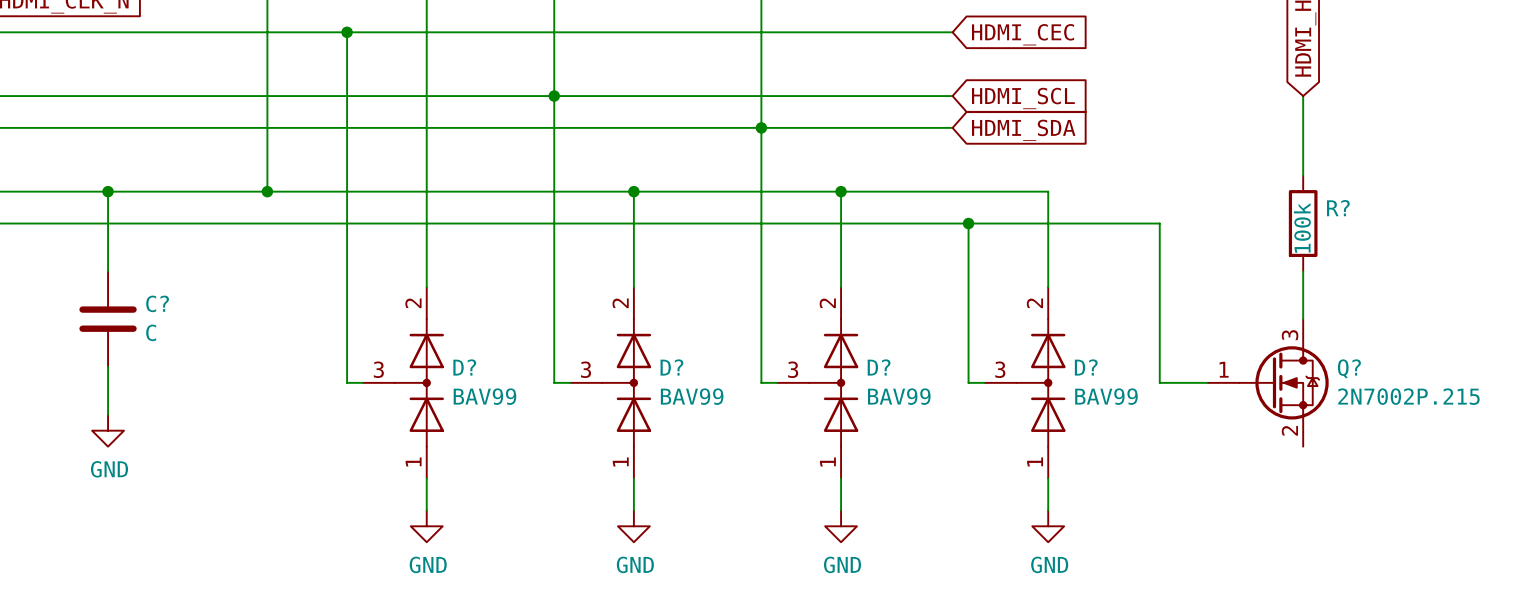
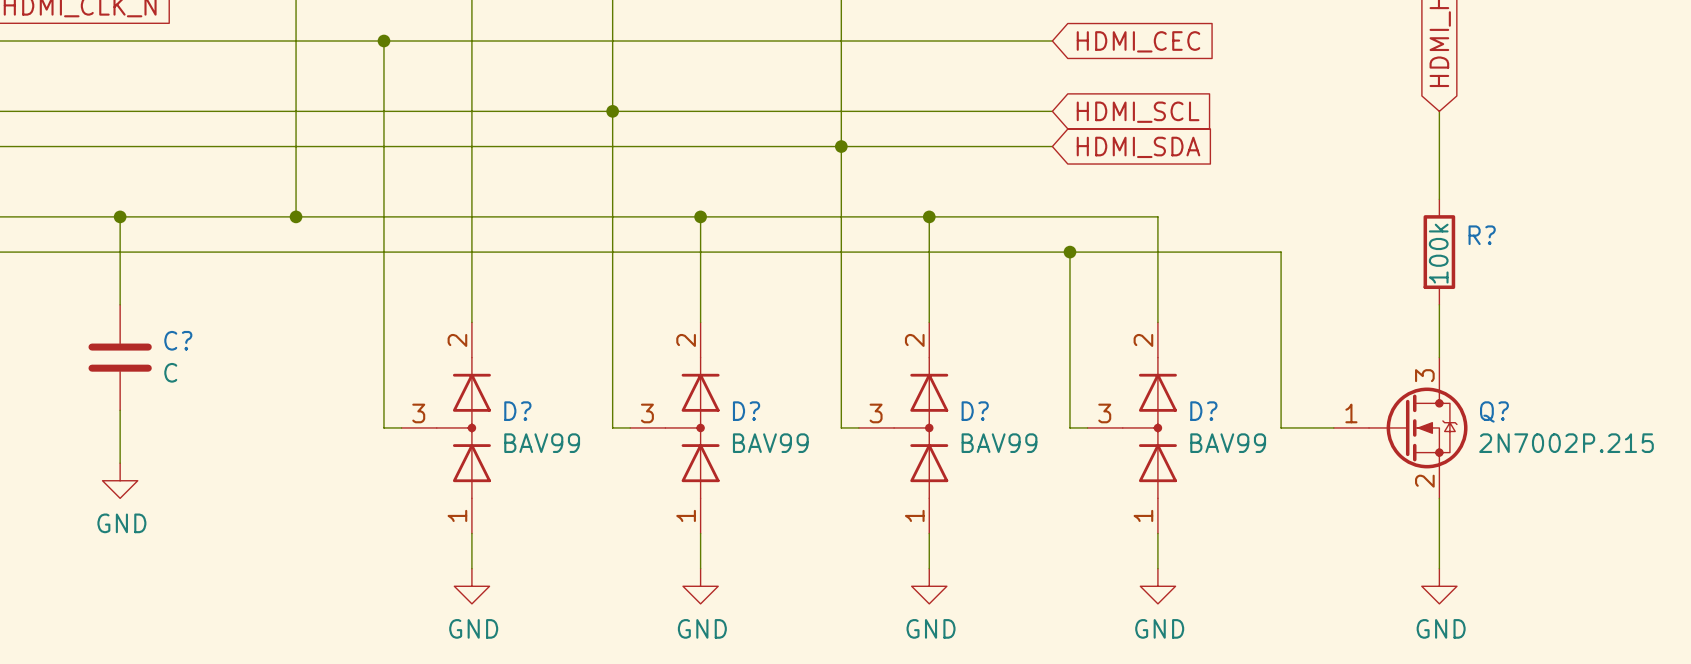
wire: none -> (1439, 498) (1439, 568)
power symbol: none -> GND (1439, 586)

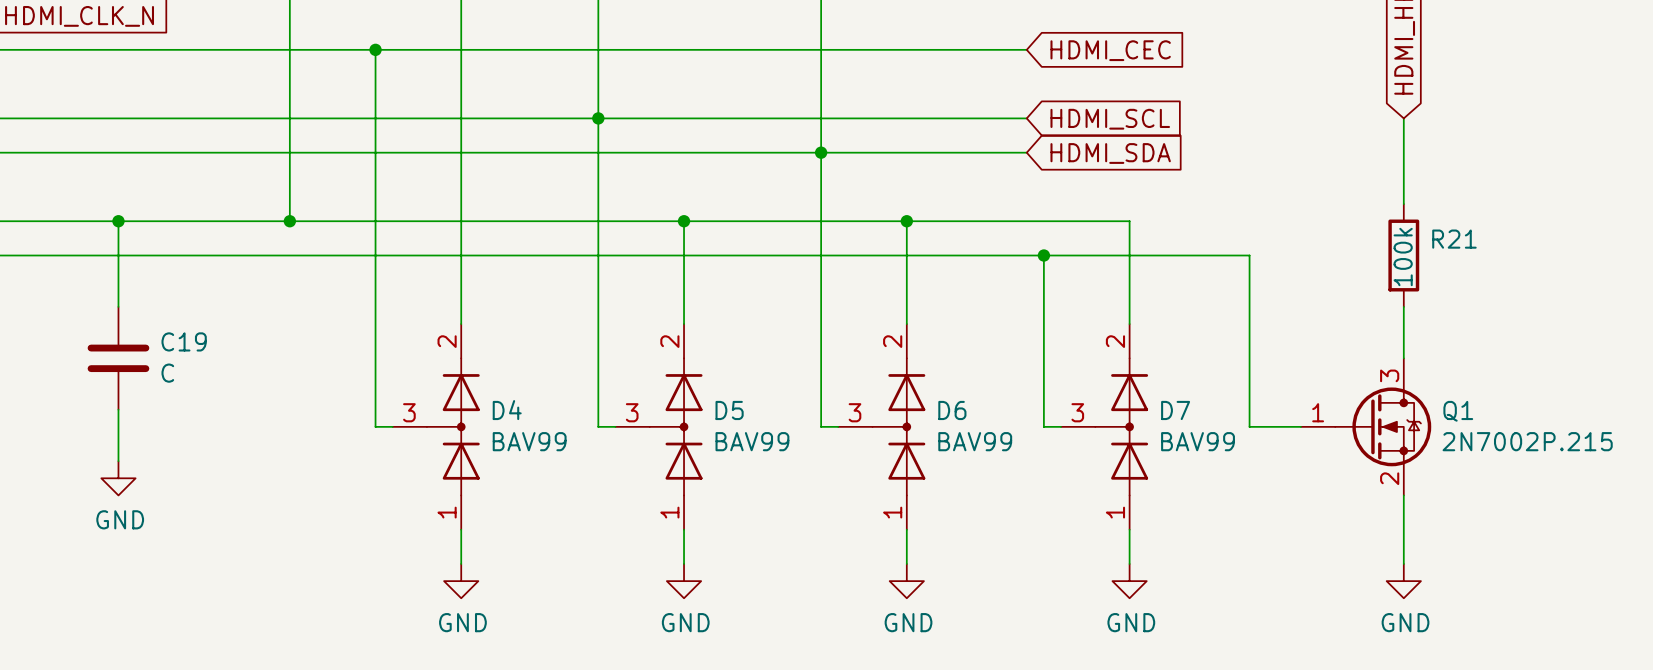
R? name: R? (1482, 235) -> R21 (1454, 239)
C? name: C? (178, 340) -> C19 (184, 341)
D? name: D? (517, 411) -> D4 (507, 410)
D? name: D? (746, 411) -> D5 (729, 410)
D? name: D? (975, 411) -> D6 (952, 410)
D? name: D? (1203, 411) -> D7 (1175, 410)
Q? name: Q? (1494, 411) -> Q1 (1458, 411)

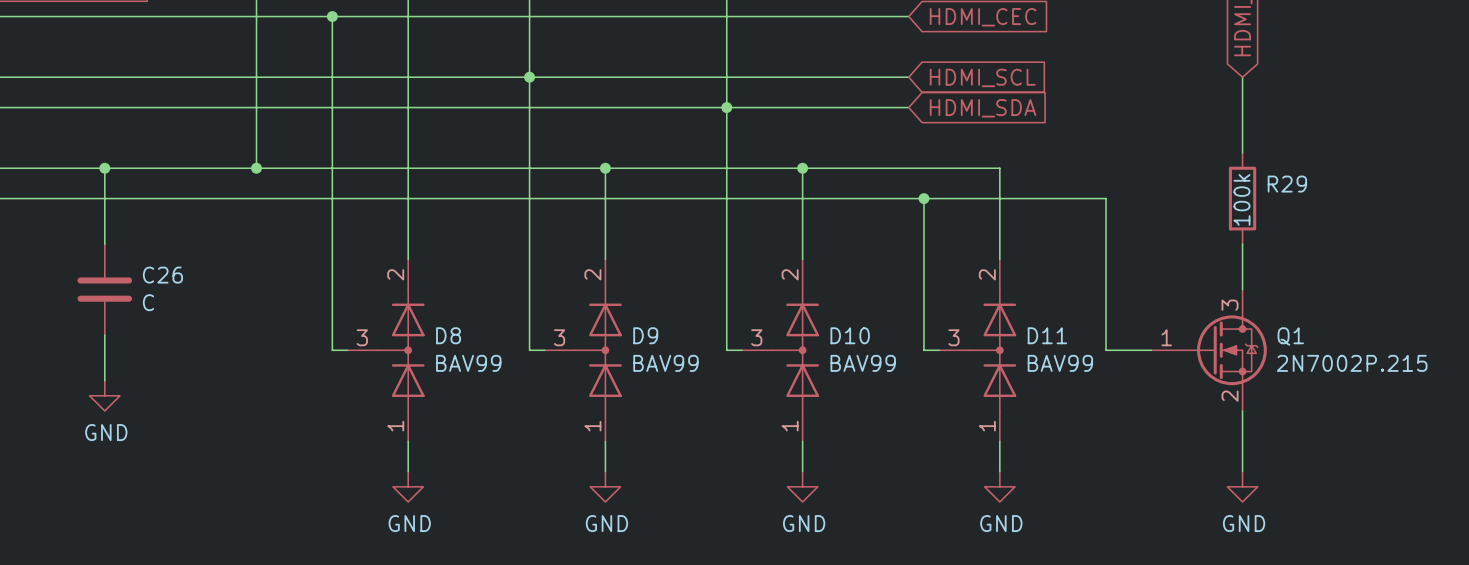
R21 name: R21 (1454, 239) -> R29 (1287, 184)
C19 name: C19 (184, 341) -> C26 (162, 275)
D4 name: D4 (507, 410) -> D8 (448, 335)
D5 name: D5 (729, 410) -> D9 (645, 335)
D6 name: D6 (952, 410) -> D10 (850, 335)
D7 name: D7 (1175, 410) -> D11 (1047, 335)

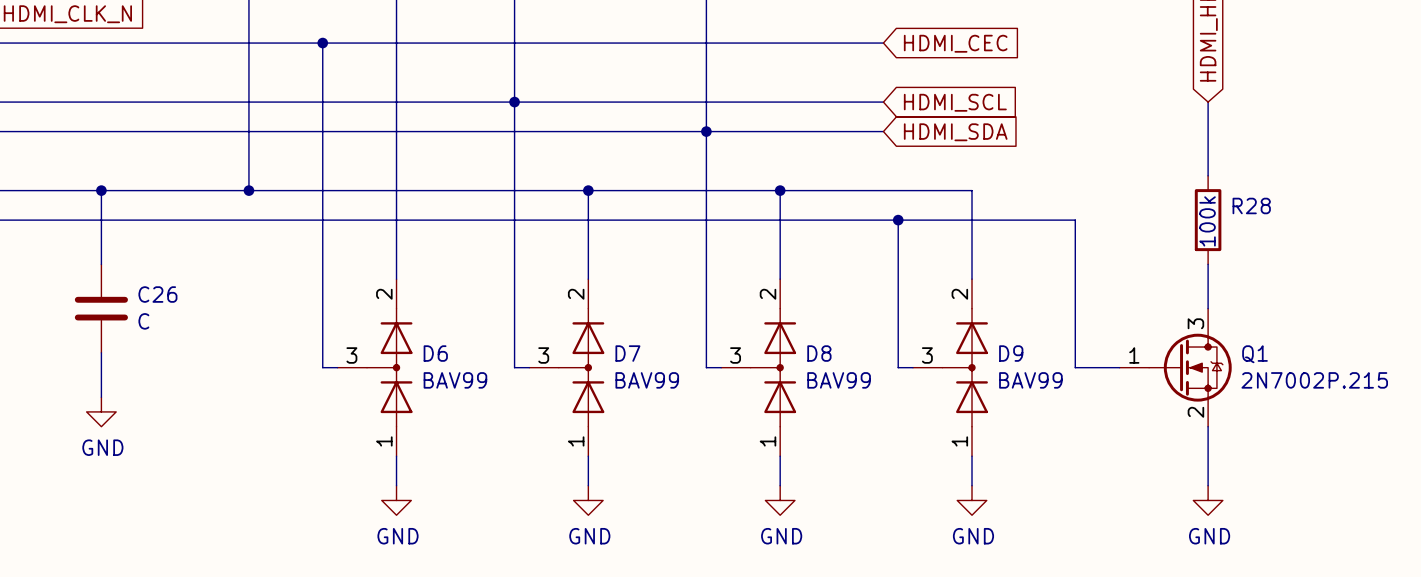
R29 name: R29 (1287, 184) -> R28 (1251, 205)
D8 name: D8 (448, 335) -> D6 (435, 353)
D9 name: D9 (645, 335) -> D7 (627, 353)
D10 name: D10 (850, 335) -> D8 (819, 353)
D11 name: D11 (1047, 335) -> D9 (1011, 353)

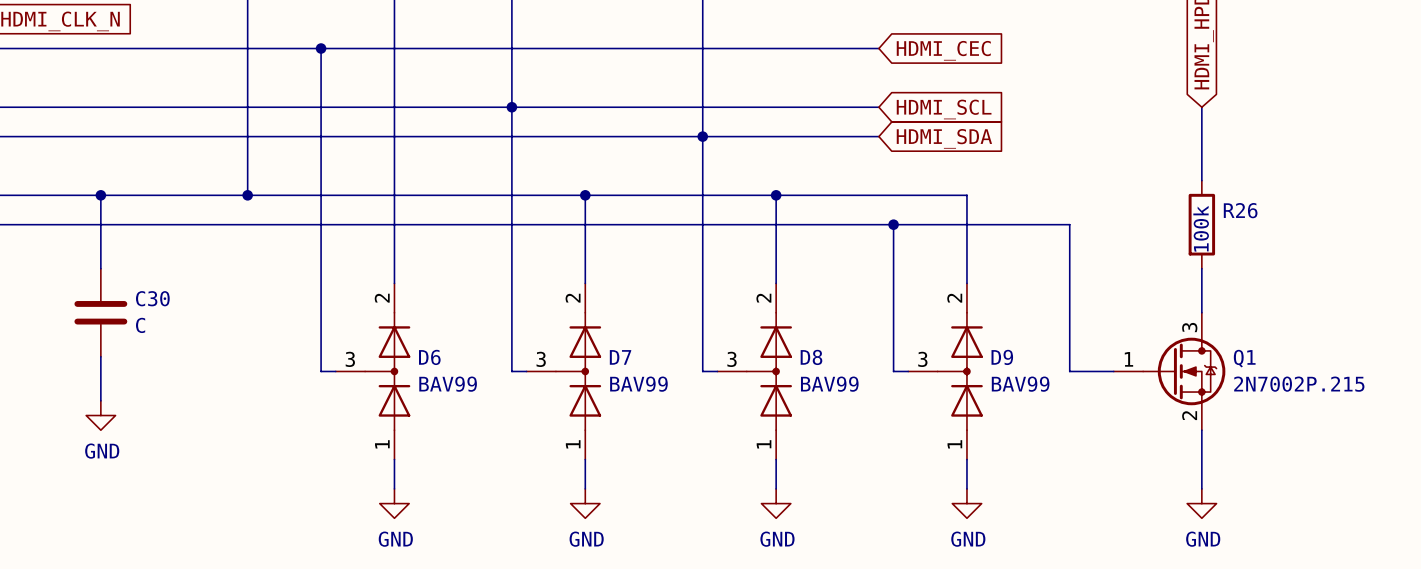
R28 name: R28 (1251, 205) -> R26 (1240, 210)
C26 name: C26 (157, 294) -> C30 (152, 298)

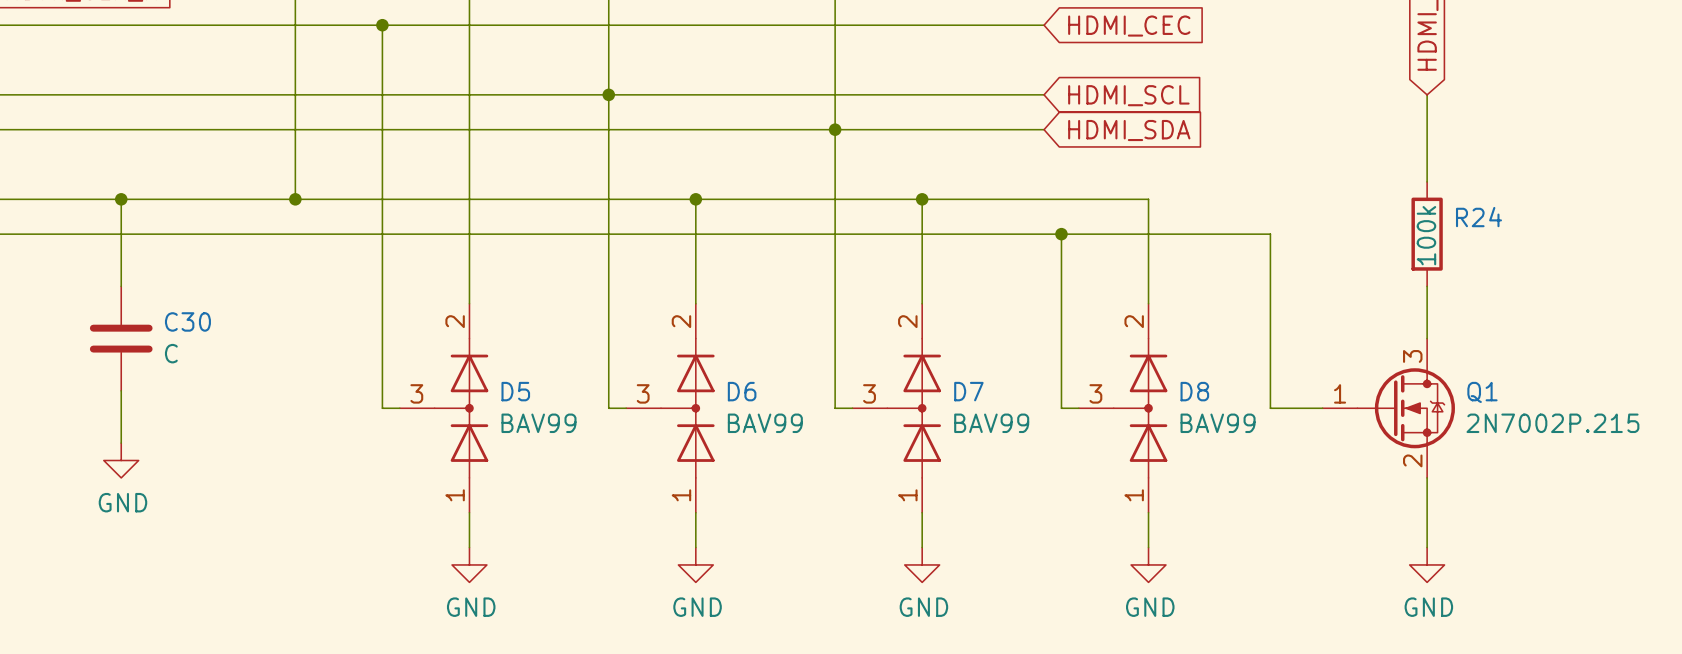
R26 name: R26 (1240, 210) -> R24 (1478, 217)
D6 name: D6 (429, 357) -> D5 (515, 391)
D7 name: D7 (620, 357) -> D6 (742, 391)
D8 name: D8 (811, 357) -> D7 (968, 391)
D9 name: D9 (1002, 357) -> D8 (1194, 391)

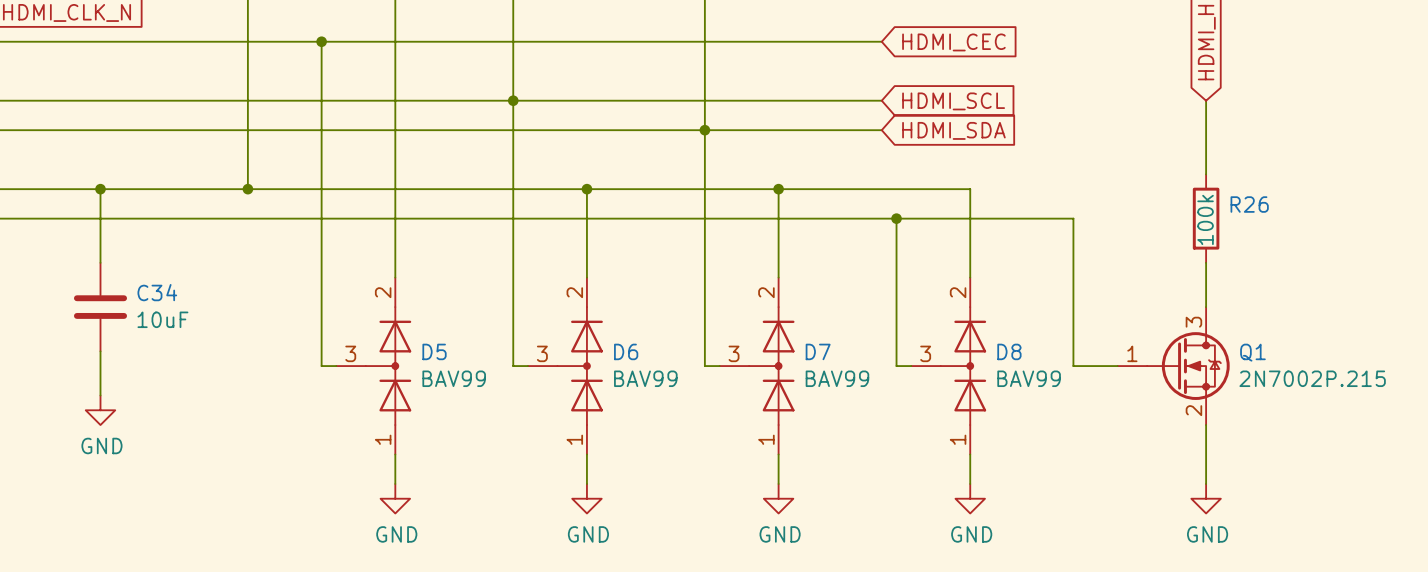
R24 name: R24 (1478, 217) -> R26 (1249, 204)
C30 name: C30 (187, 321) -> C34 (157, 292)
C30 value: C (171, 353) -> 10uF (162, 319)

